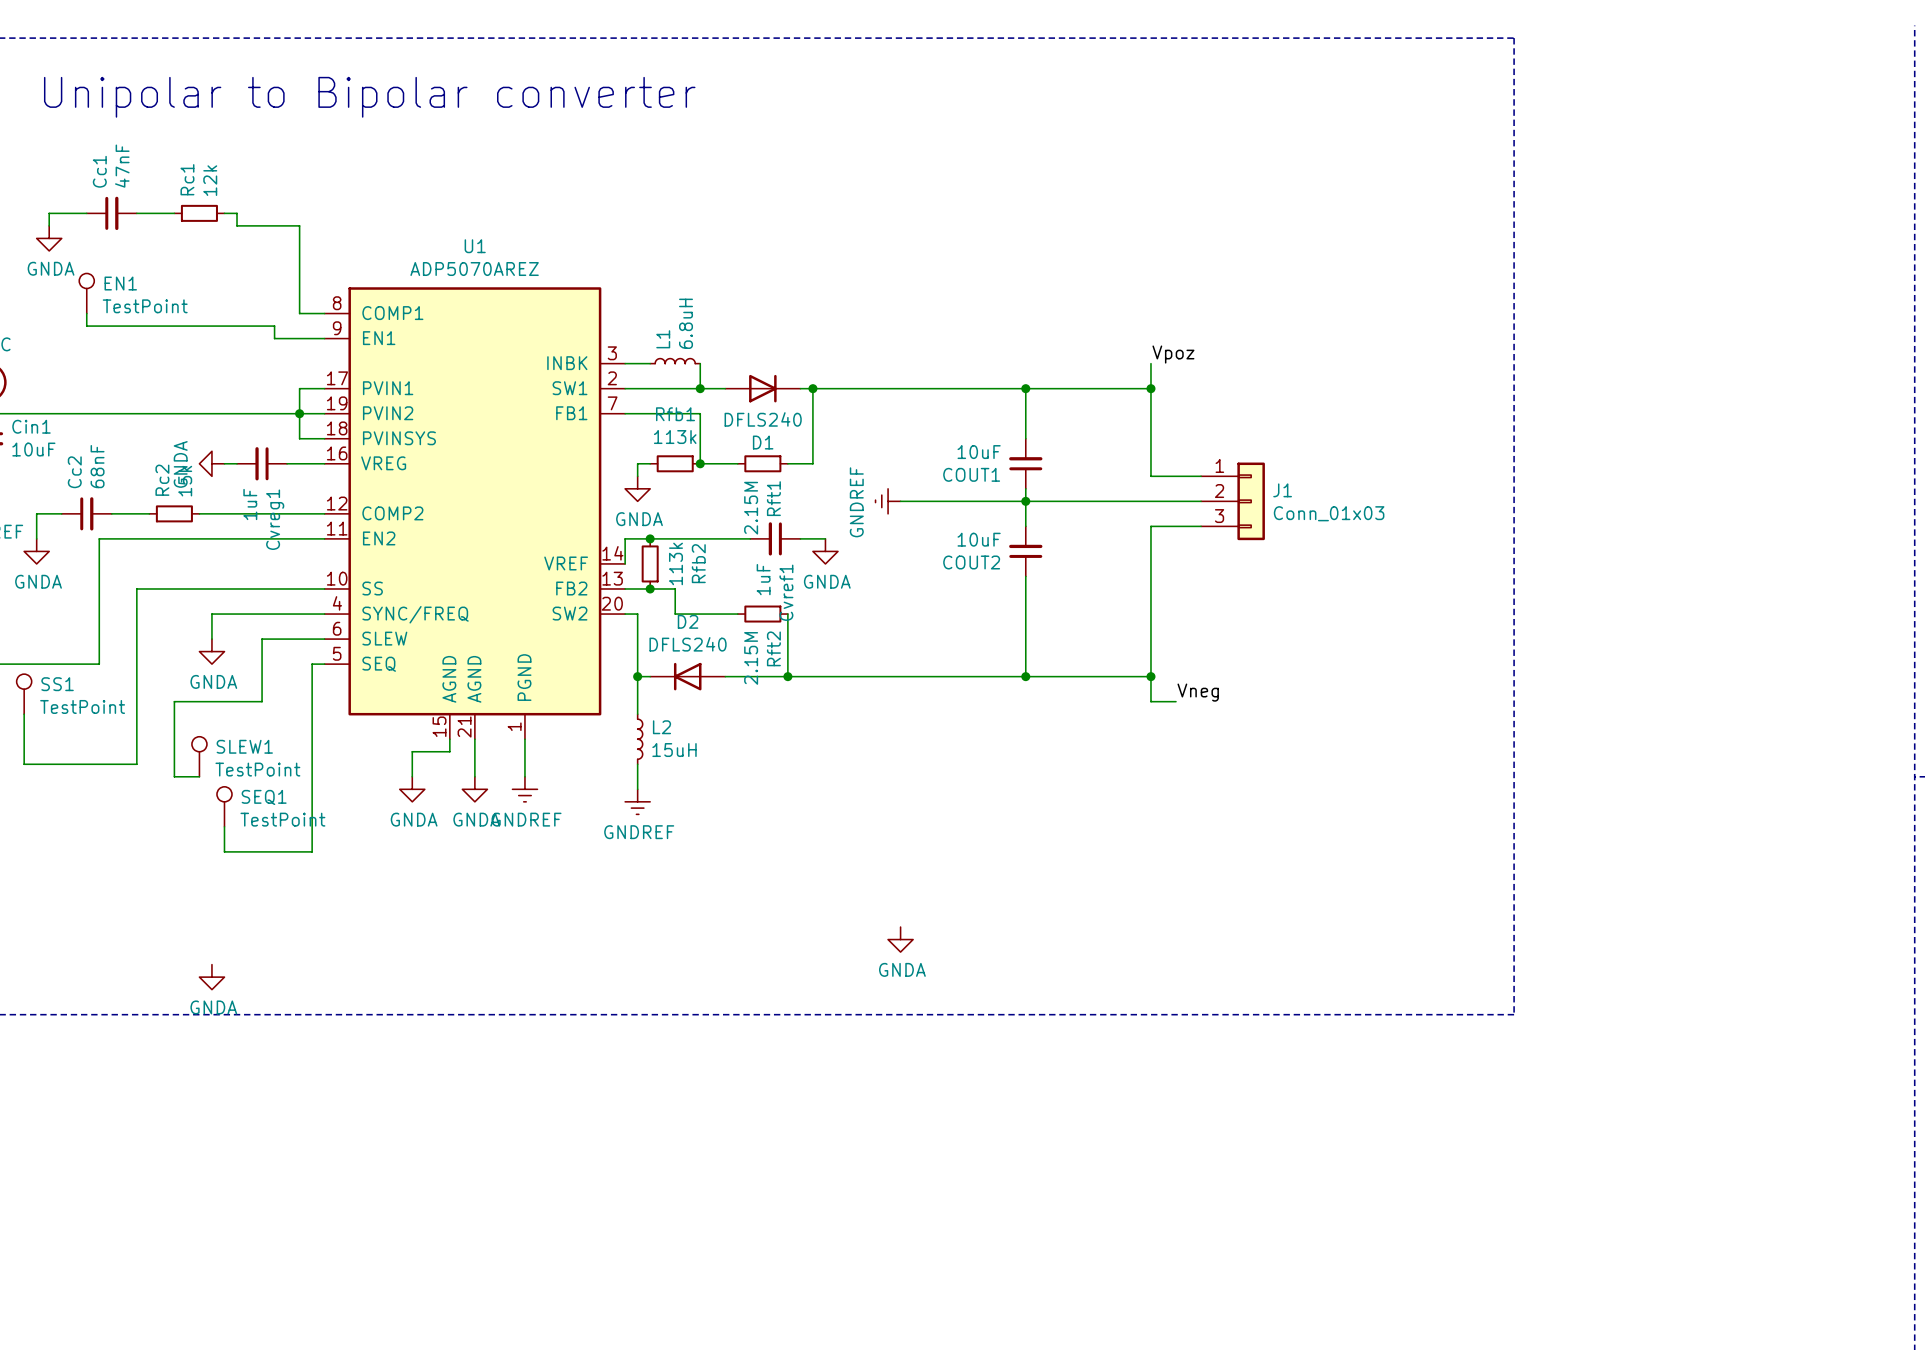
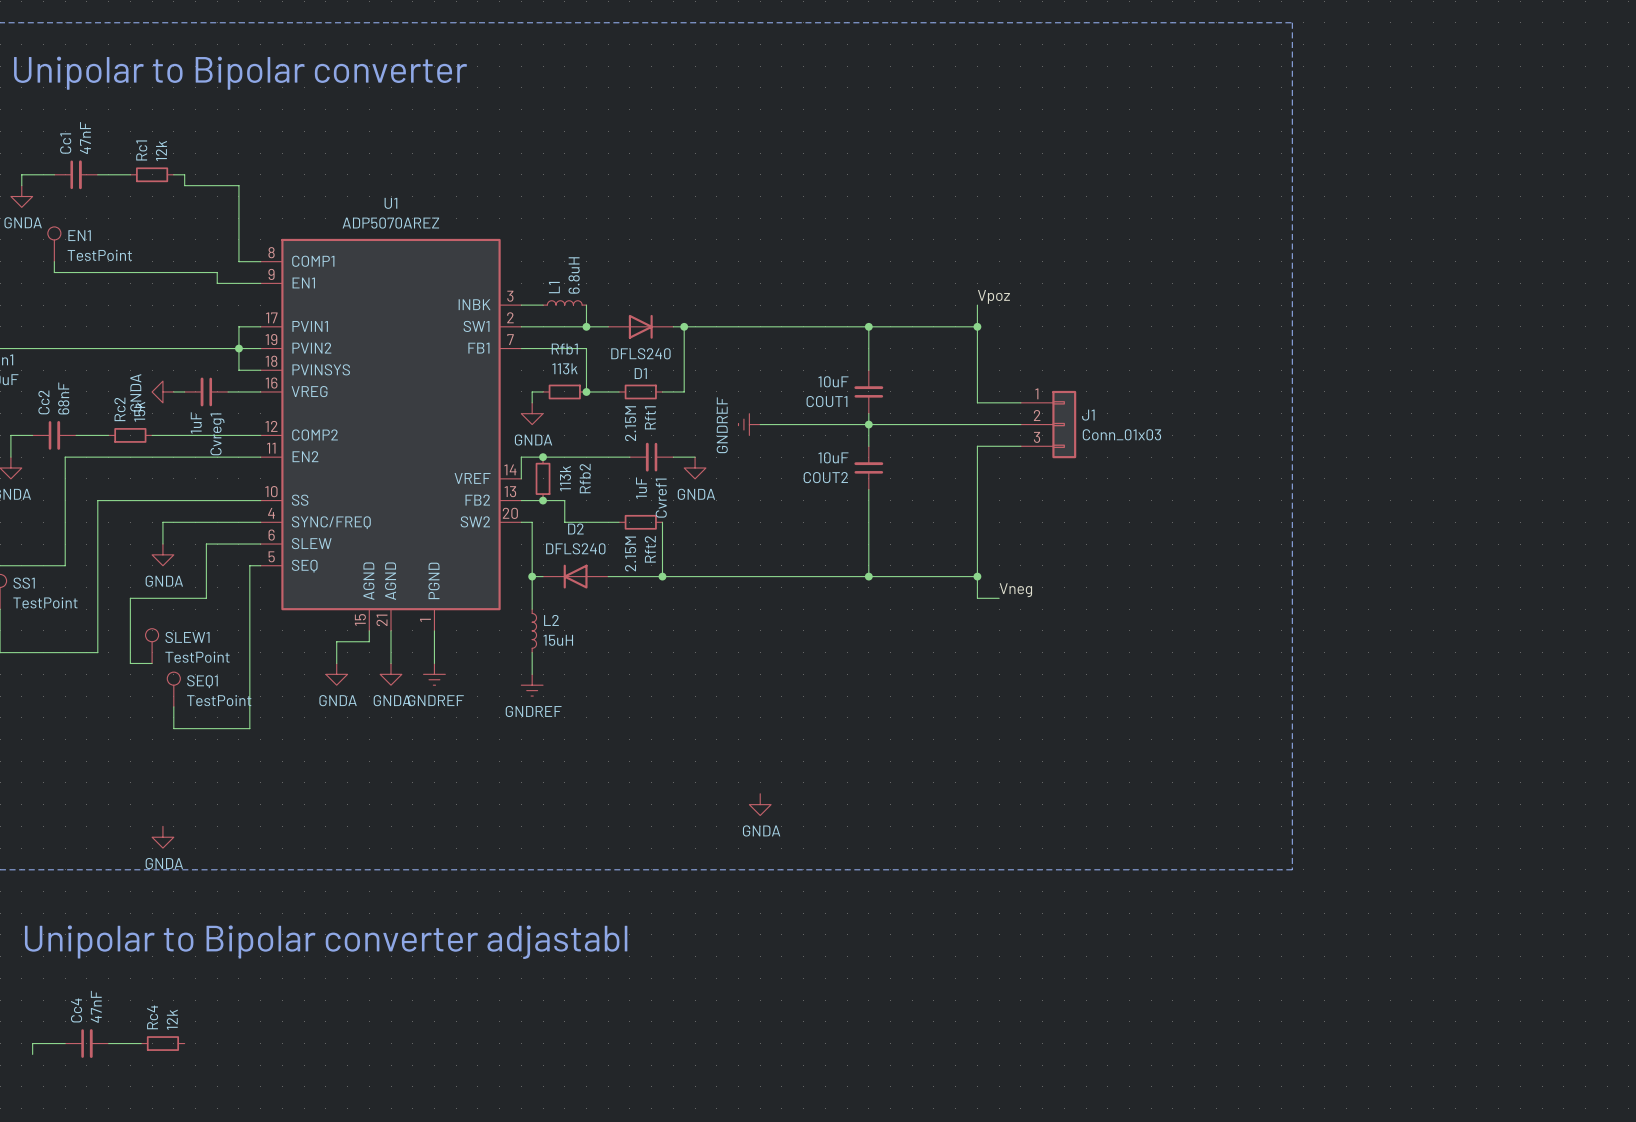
text: none -> Unipolar to Bipolar converter adjastabl (326, 942)
wire: none -> (65, 1043) (32, 1043) (32, 1054)
Cc4: none -> 47nF (86, 1043)
wire: none -> (108, 1043) (141, 1043)
Rc4: none -> 12k (162, 1043)

